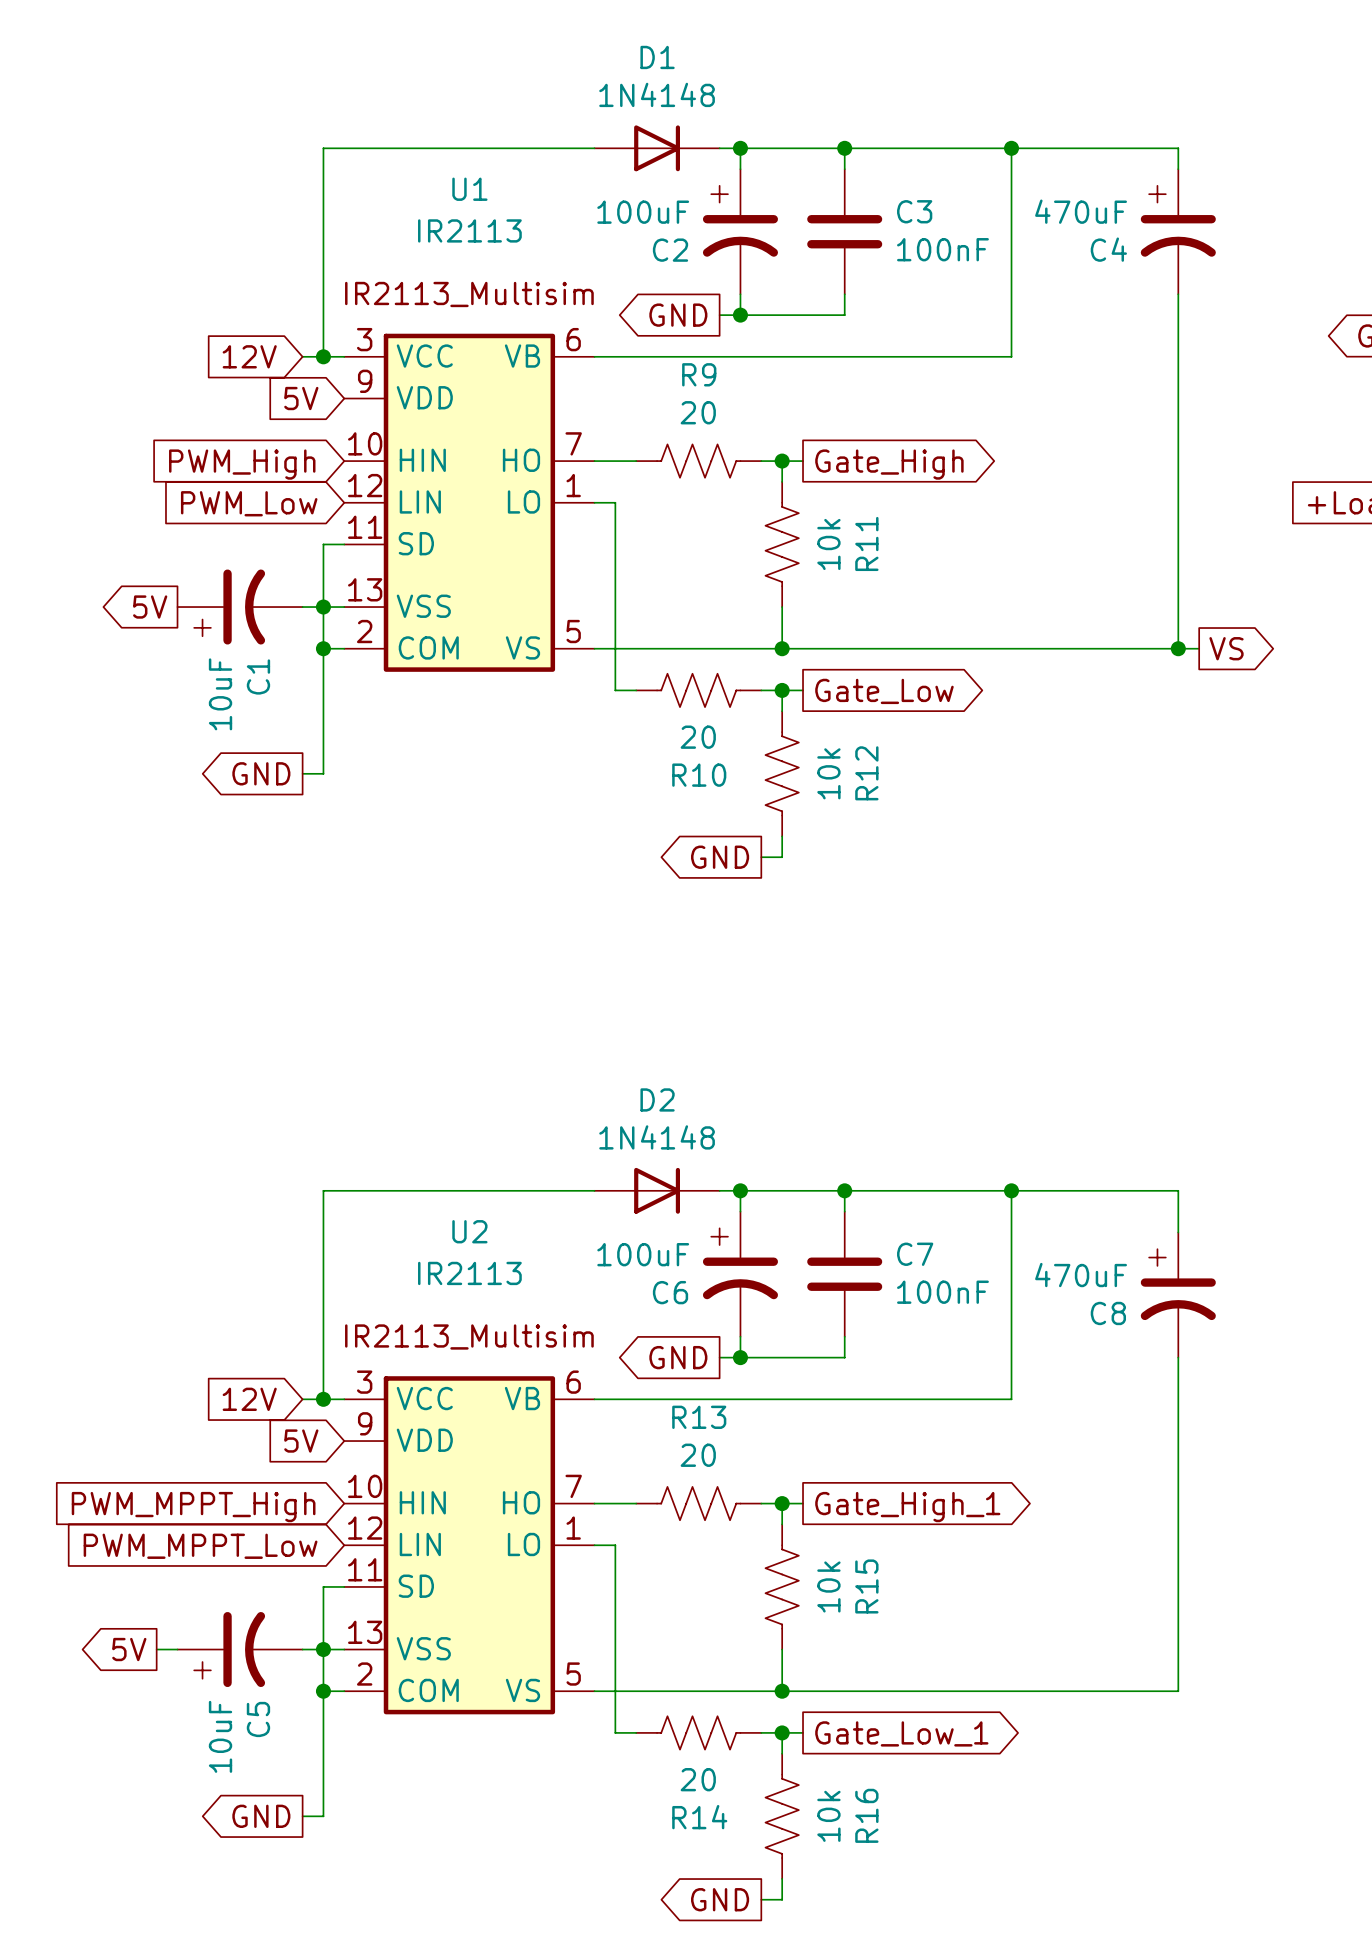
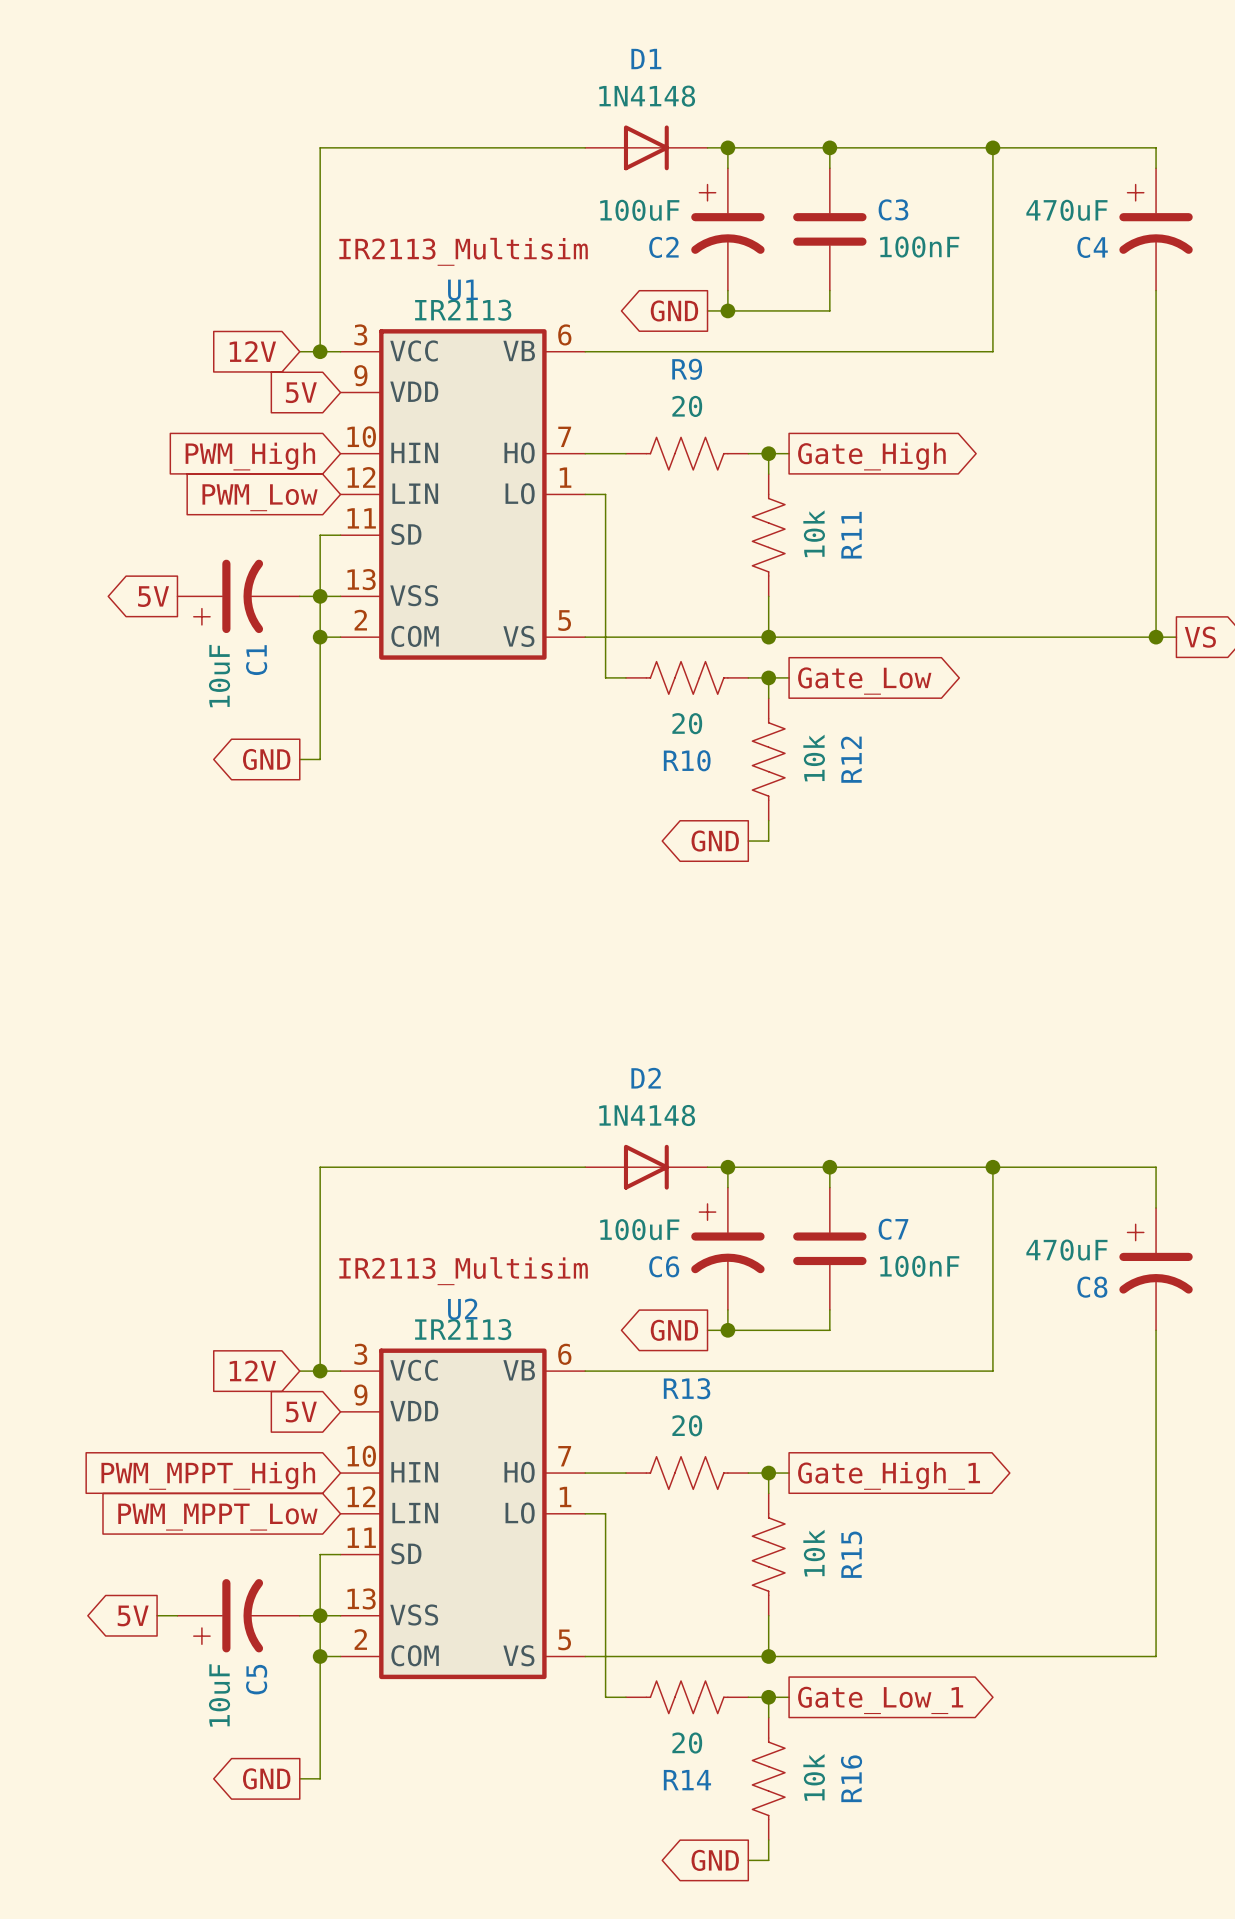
U1 name position: U1 (469, 189) -> U1 (462, 290)
U1 value position: IR2113 (469, 230) -> IR2113 (463, 310)
U1 text position: IR2113_Multisim (469, 294) -> IR2113_Multisim (463, 251)
U2 name position: U2 (469, 1231) -> U2 (462, 1309)
U2 value position: IR2113 (469, 1273) -> IR2113 (463, 1329)
U2 text position: IR2113_Multisim (469, 1336) -> IR2113_Multisim (463, 1271)

